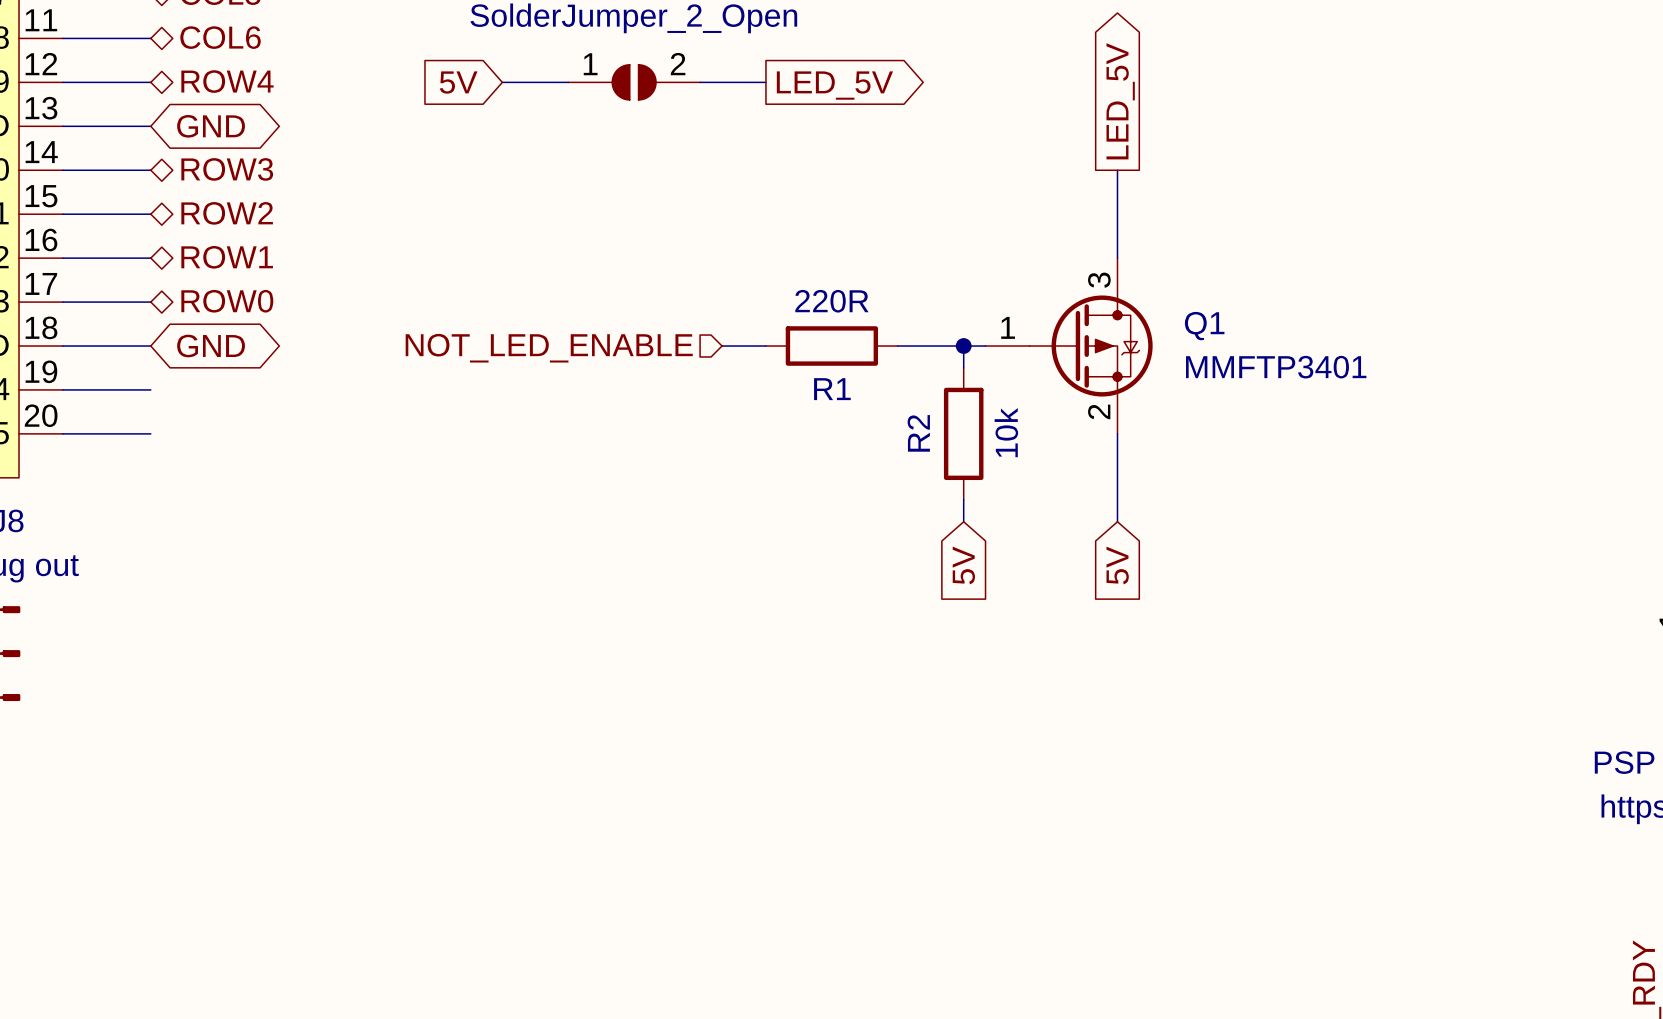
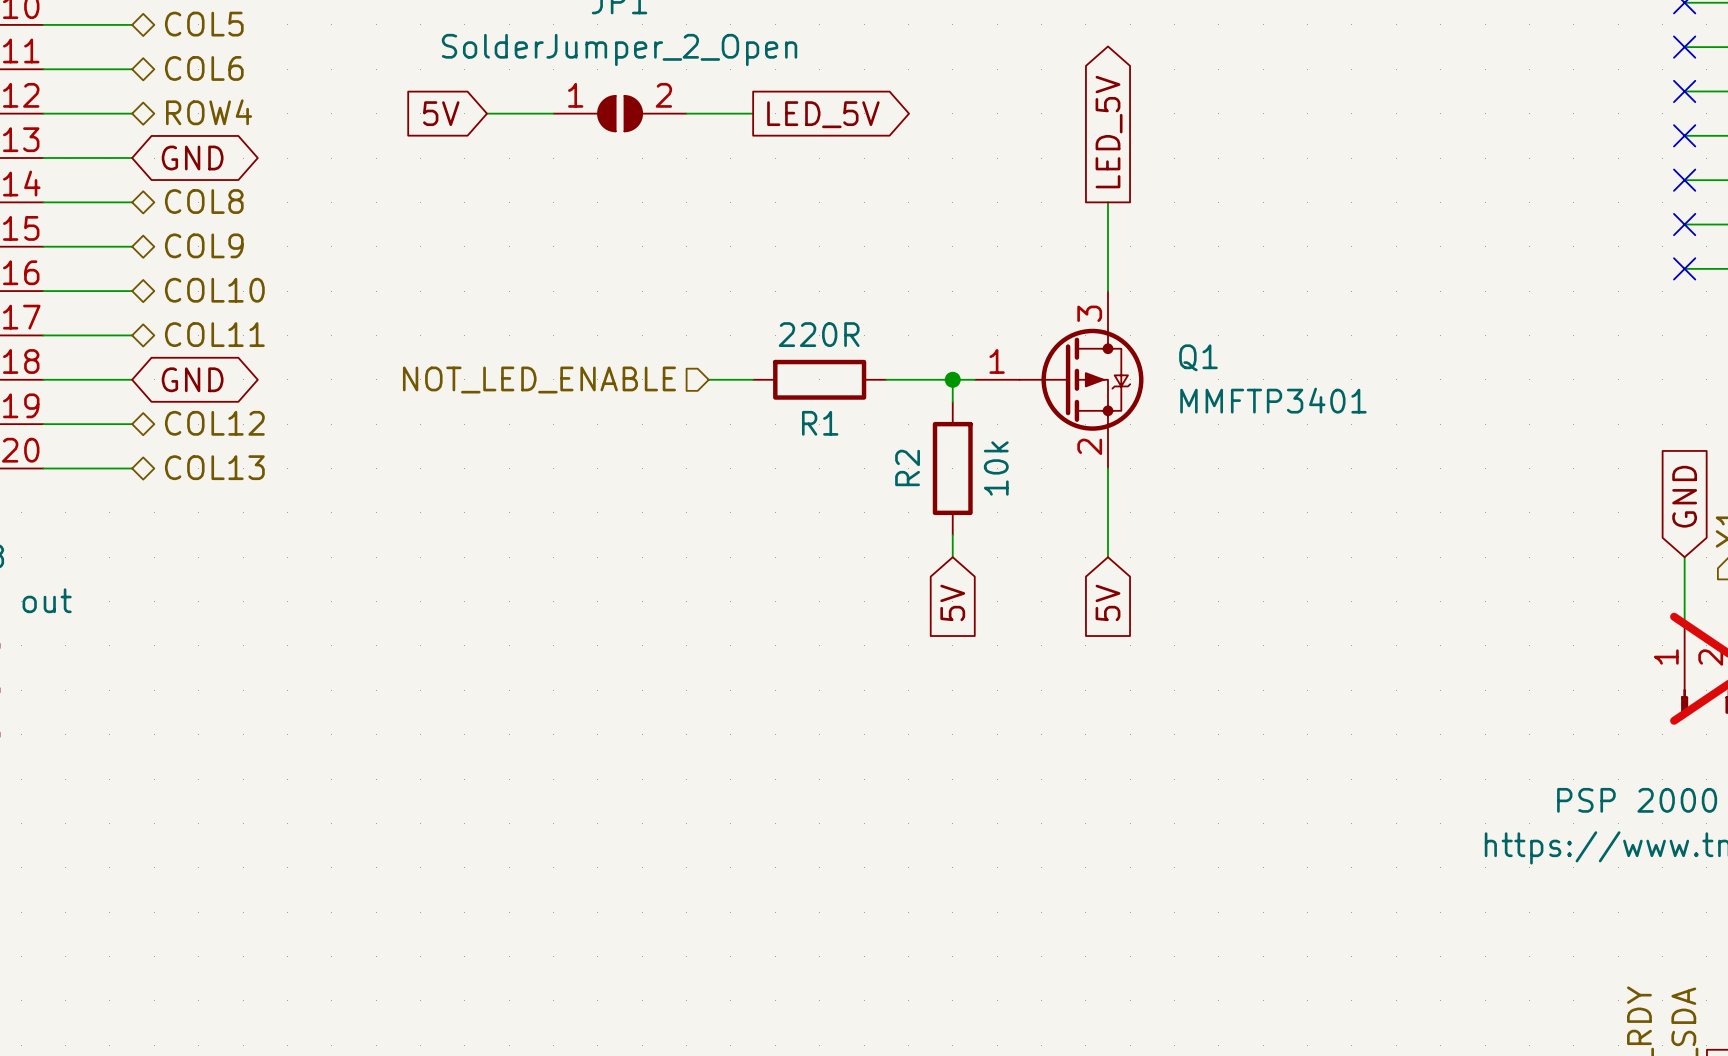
hierarchical label: ROW3 (227, 169) -> COL8 (204, 201)
hierarchical label: ROW2 (227, 213) -> COL9 (204, 245)
hierarchical label: ROW1 (227, 257) -> COL10 (214, 290)
hierarchical label: ROW0 (227, 301) -> COL11 (214, 334)
hierarchical label: none -> COL12 (214, 423)
hierarchical label: none -> COL13 (214, 467)

